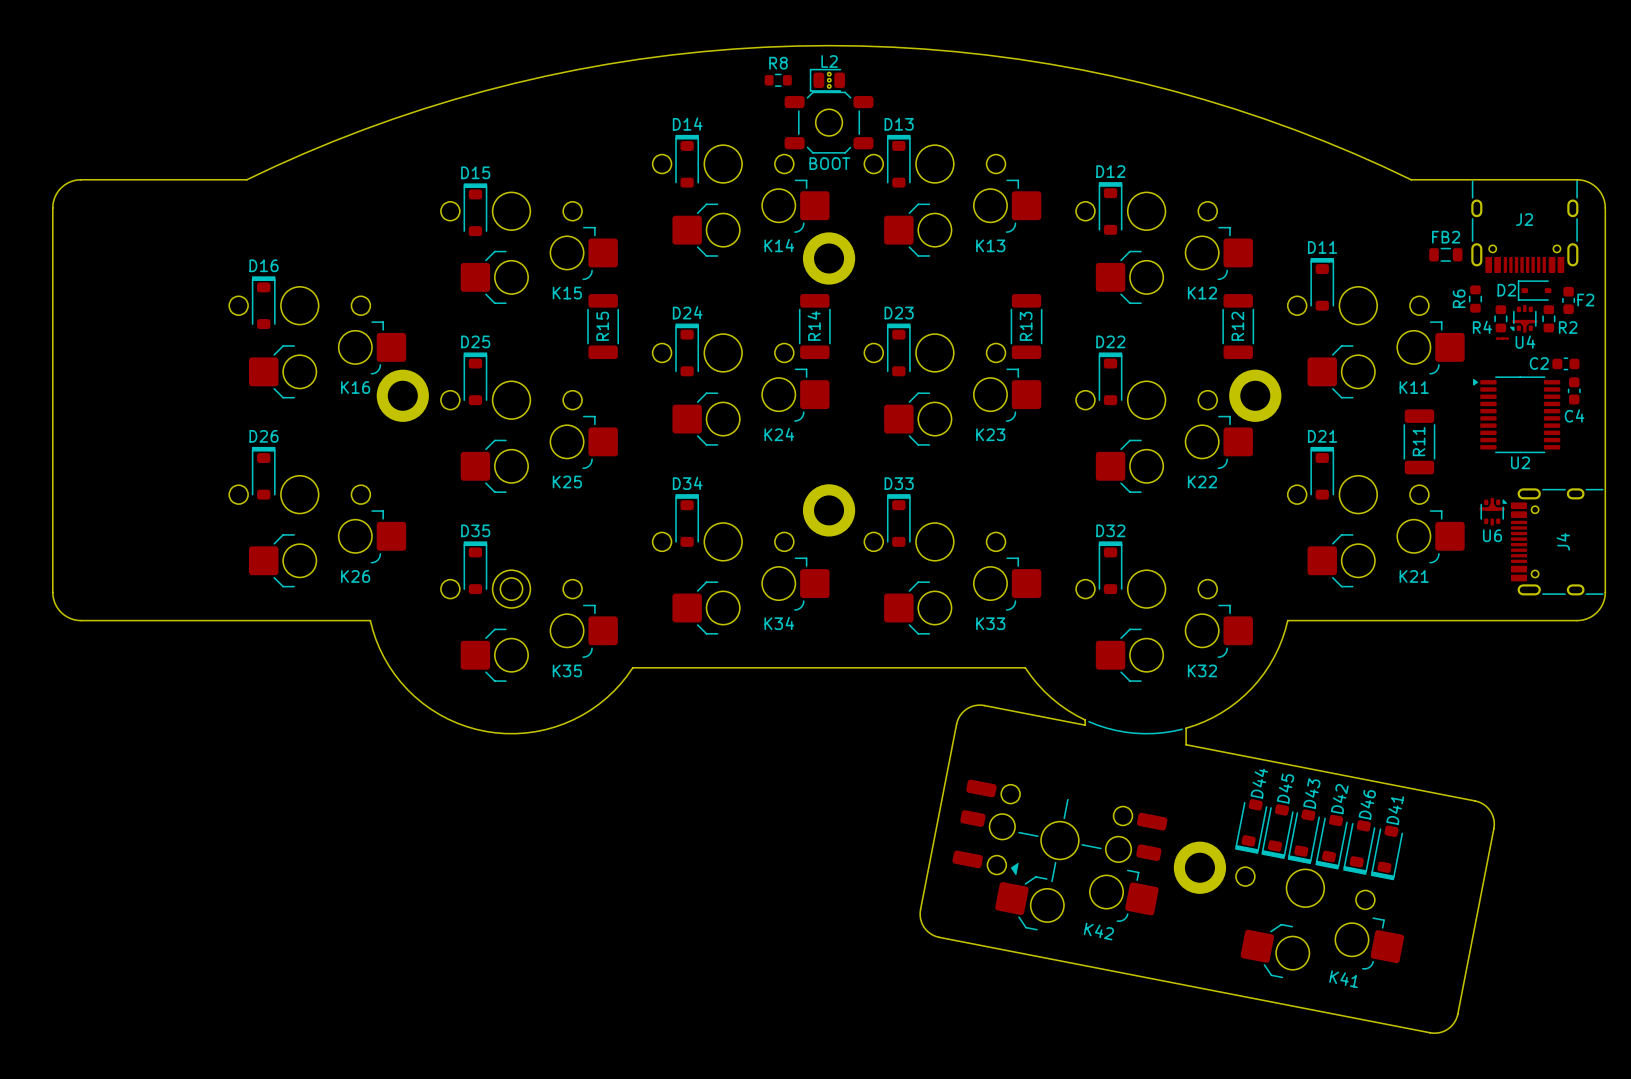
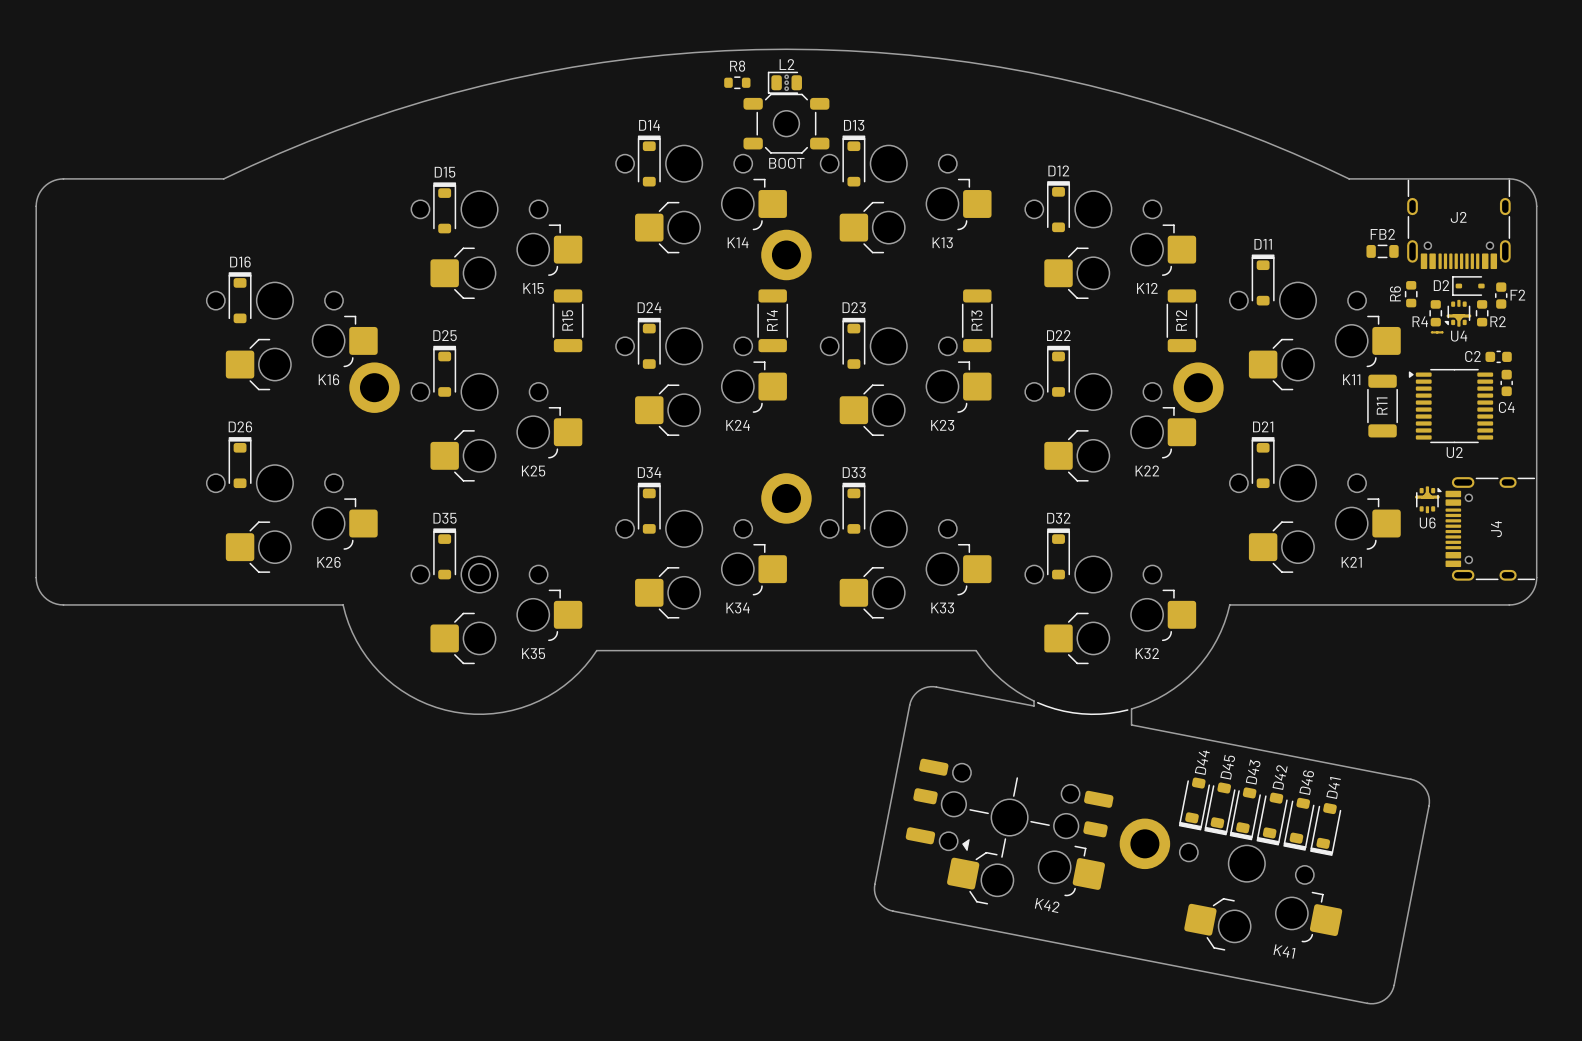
R11 position: (1419, 441) -> (1382, 406)

